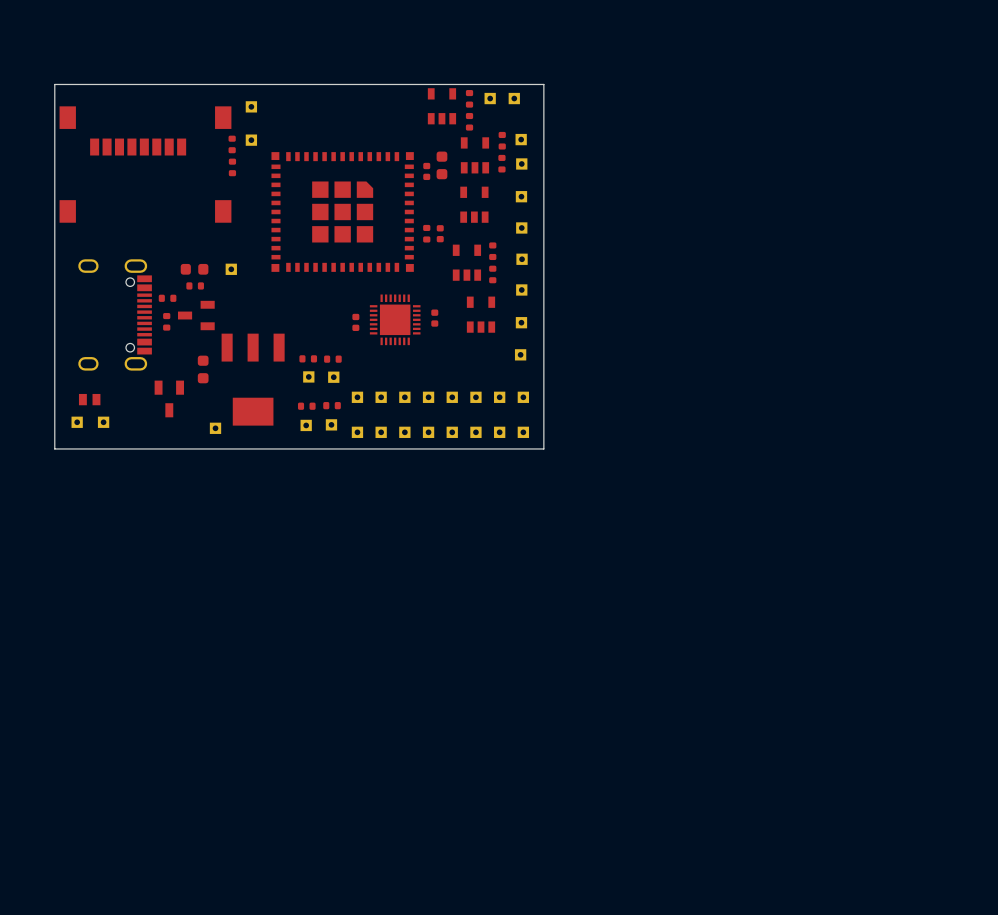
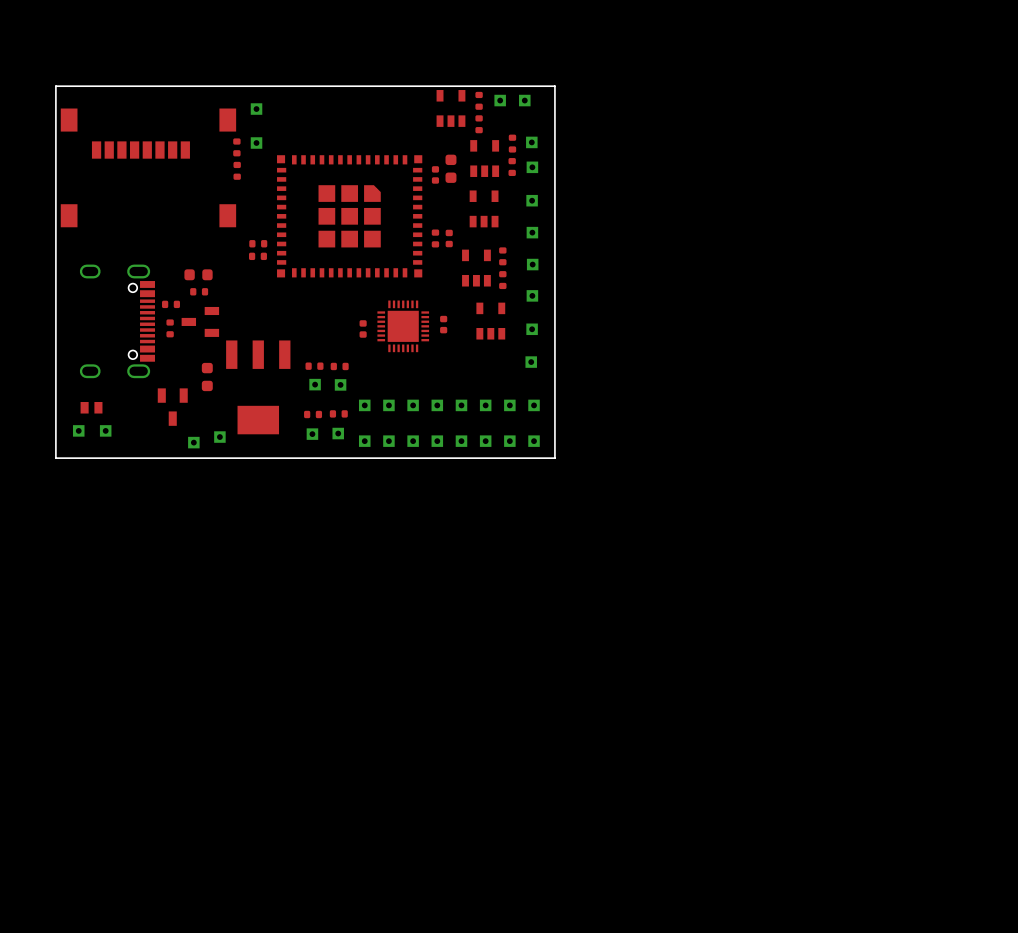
part: none -> (258, 243)
part: none -> (257, 256)
part position: (231, 269) -> (193, 442)

